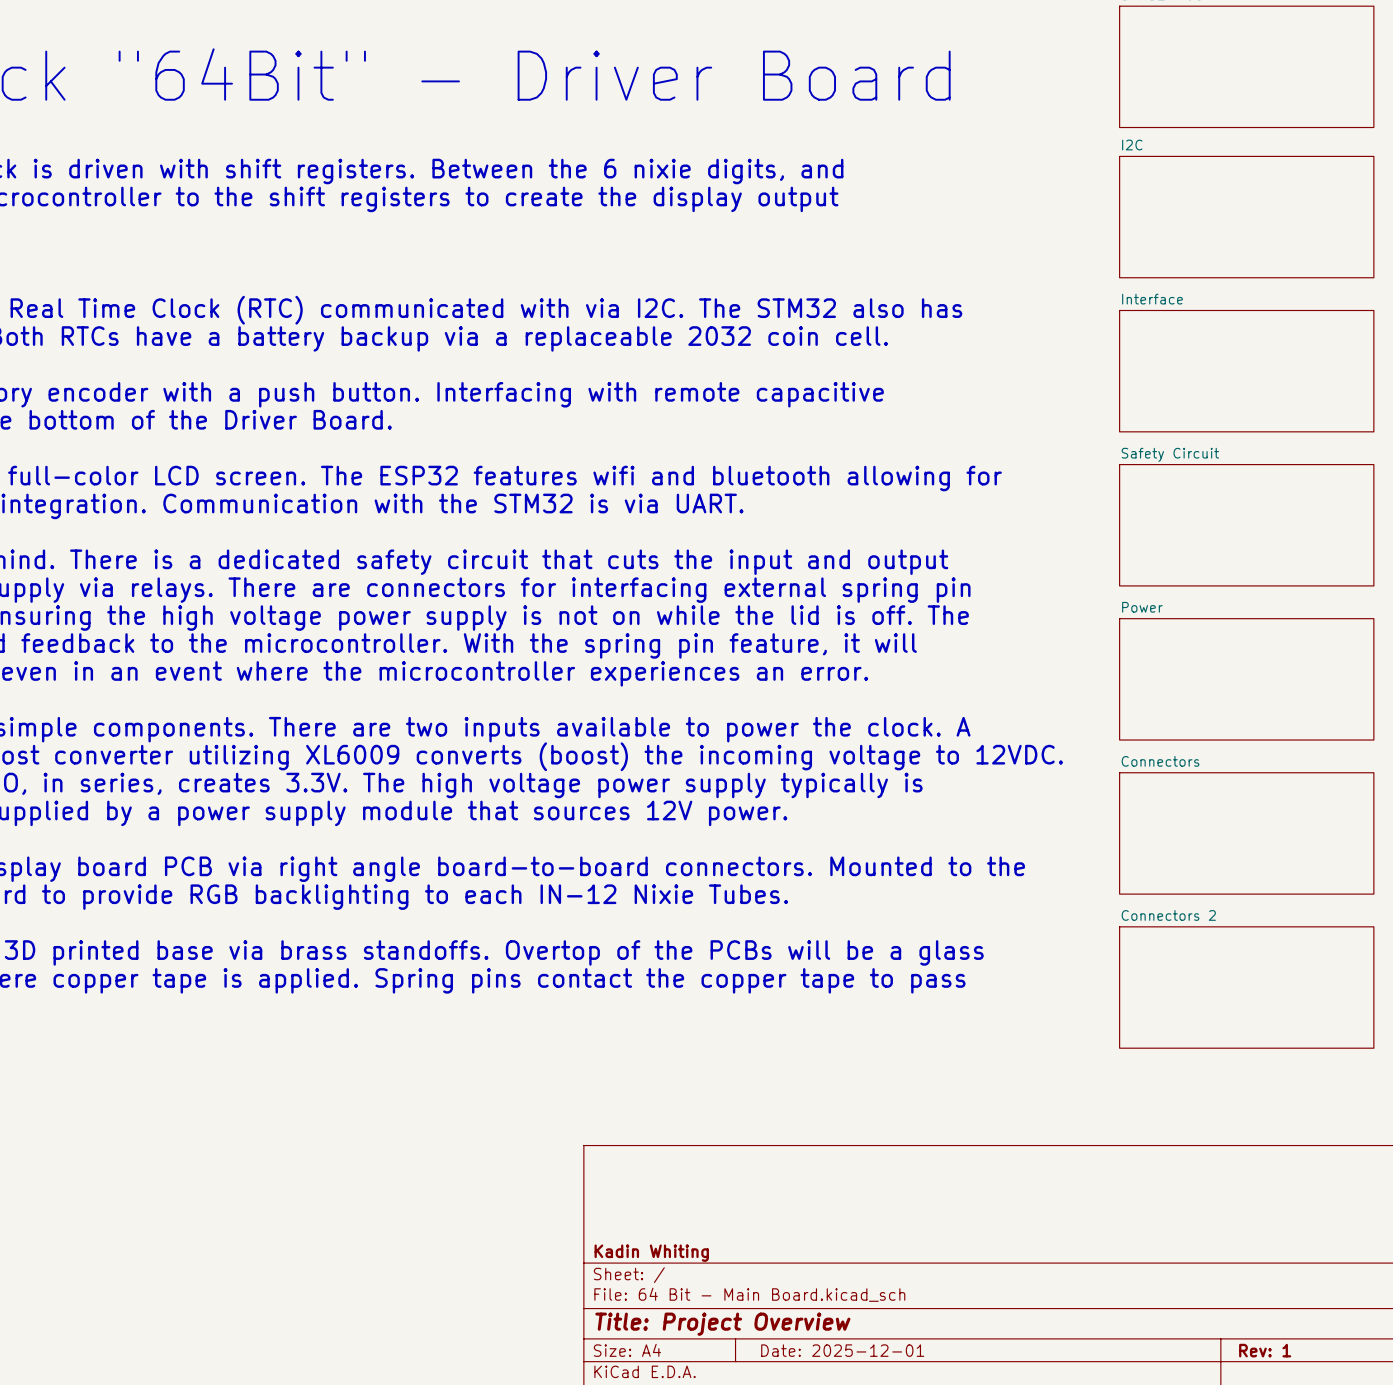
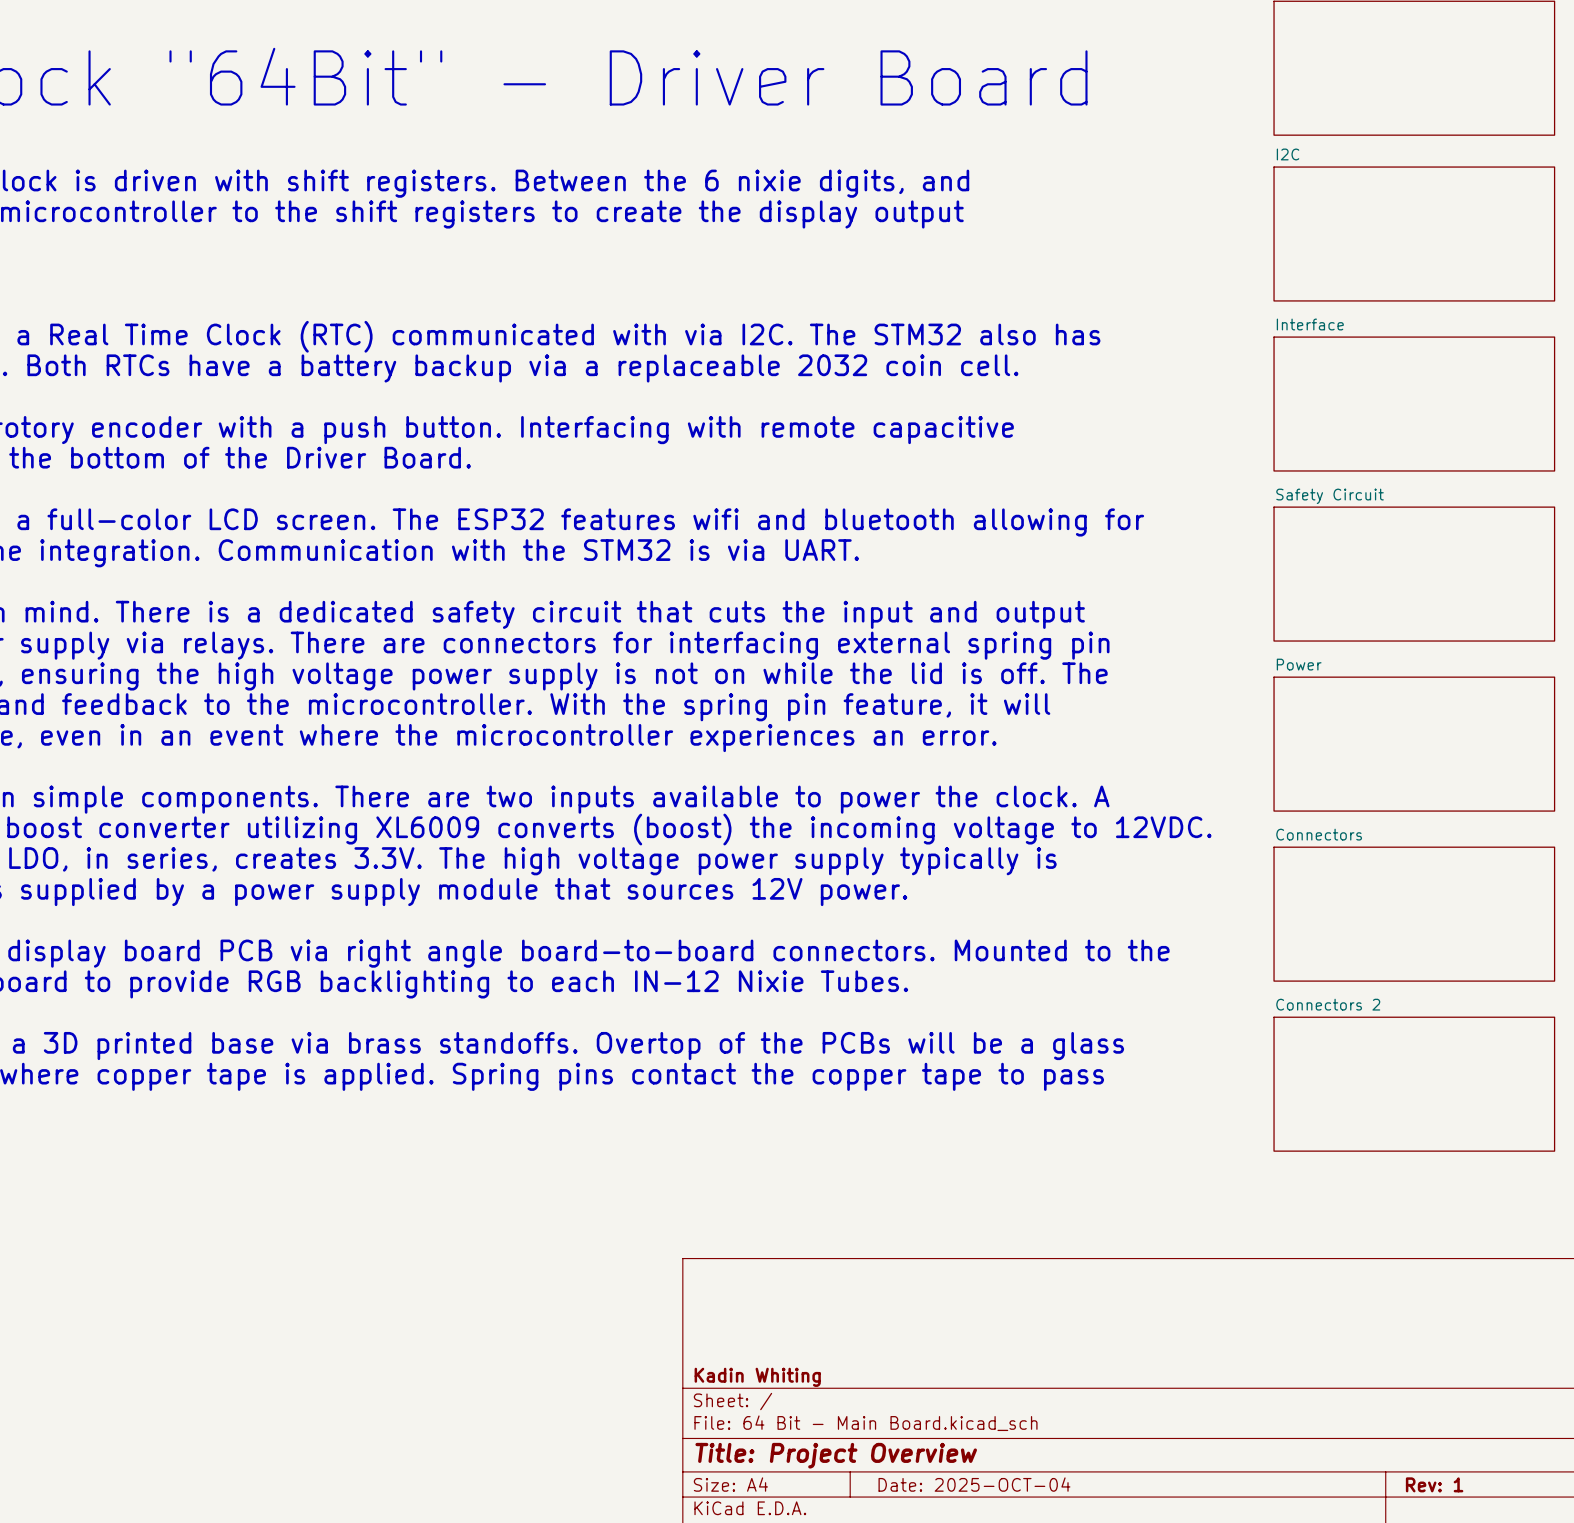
title block: Date: 2025-12-01 (842, 1350) -> Date: 2025-OCT-04 (974, 1484)

